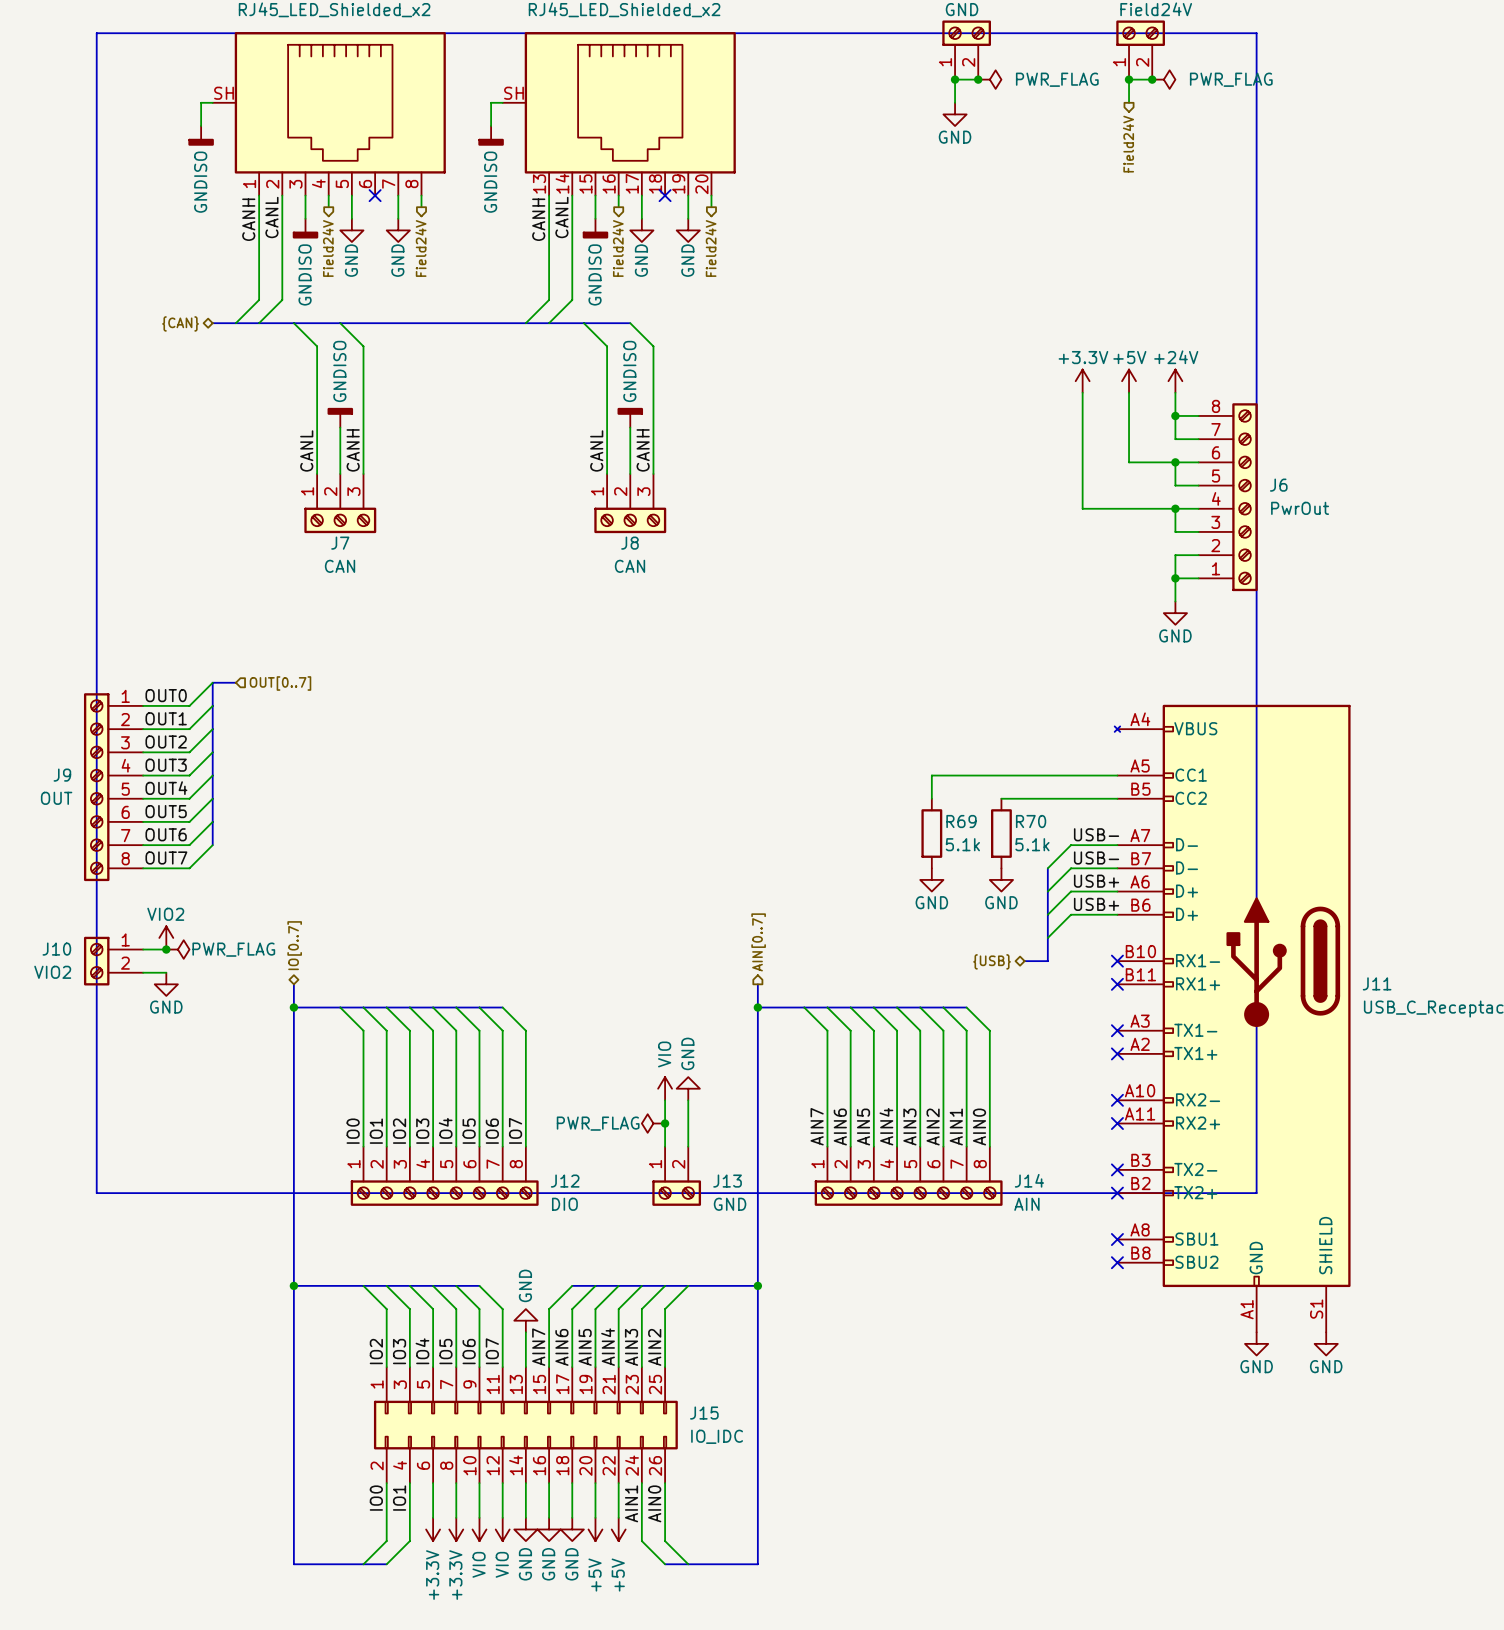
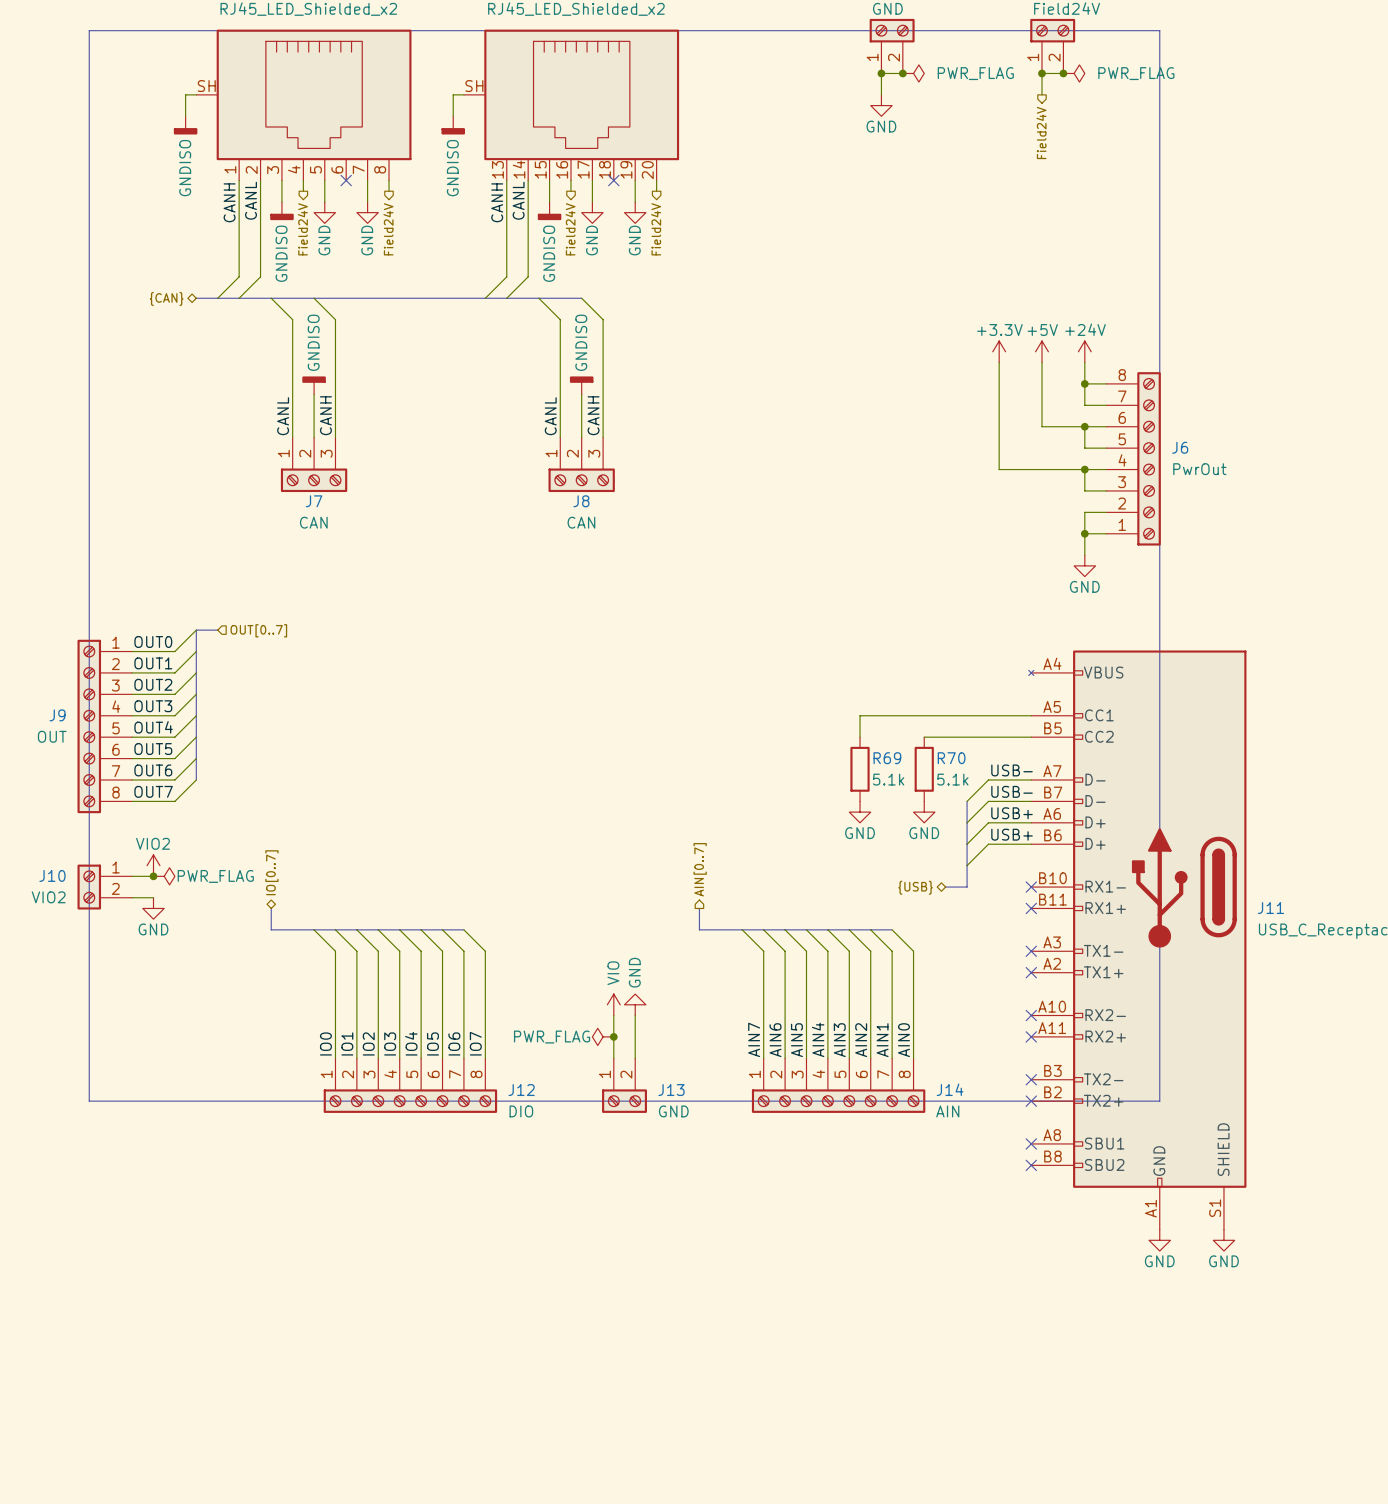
bus: (293, 1007) (293, 1564) (386, 1564) -> none
junction: (293, 1007) -> none
bus: (757, 1007) (757, 1564) (665, 1564) -> none
junction: (757, 1007) -> none
bus: (293, 1285) (479, 1285) -> none
junction: (293, 1285) -> none
wire: (363, 1285) (386, 1309) (386, 1367) -> none
wire: (386, 1285) (409, 1309) (409, 1367) -> none
wire: (409, 1285) (433, 1309) (433, 1367) -> none
wire: (433, 1285) (456, 1309) (456, 1367) -> none
wire: (456, 1285) (479, 1309) (479, 1367) -> none
wire: (479, 1285) (502, 1309) (502, 1367) -> none
wire: (572, 1285) (549, 1309) (549, 1367) -> none
bus: (572, 1285) (757, 1285) -> none
wire: (595, 1285) (572, 1309) (572, 1367) -> none
wire: (618, 1285) (595, 1309) (595, 1367) -> none
wire: (641, 1285) (618, 1309) (618, 1367) -> none
wire: (665, 1285) (641, 1309) (641, 1367) -> none
wire: (688, 1285) (665, 1309) (665, 1367) -> none
junction: (757, 1285) -> none
power symbol: GND (525, 1320) -> none
wire: (525, 1332) (525, 1367) -> none
label: AIN7 (538, 1347) -> none
label: AIN6 (561, 1347) -> none
label: AIN5 (585, 1347) -> none
label: AIN4 (608, 1347) -> none
label: AIN3 (631, 1347) -> none
label: AIN2 (654, 1347) -> none
label: IO2 (376, 1351) -> none
label: IO3 (399, 1351) -> none
label: IO4 (422, 1351) -> none
label: IO5 (445, 1351) -> none
label: IO6 (469, 1351) -> none
label: IO7 (492, 1351) -> none
J15: IO_IDC (525, 1425) -> none
wire: (386, 1483) (386, 1541) (363, 1564) -> none
wire: (409, 1483) (409, 1541) (386, 1564) -> none
wire: (433, 1483) (433, 1517) -> none
wire: (456, 1483) (456, 1517) -> none
wire: (479, 1483) (479, 1517) -> none
wire: (502, 1483) (502, 1517) -> none
wire: (525, 1483) (525, 1517) -> none
wire: (549, 1483) (549, 1517) -> none
wire: (572, 1483) (572, 1517) -> none
wire: (595, 1483) (595, 1517) -> none
wire: (618, 1483) (618, 1517) -> none
wire: (641, 1483) (641, 1541) (665, 1564) -> none
wire: (665, 1483) (665, 1541) (688, 1564) -> none
label: IO0 (376, 1498) -> none
label: IO1 (399, 1498) -> none
label: AIN1 (631, 1503) -> none
label: AIN0 (654, 1503) -> none
power symbol: +3.3V (433, 1529) -> none
power symbol: +3.3V (456, 1529) -> none
power symbol: VIO (479, 1529) -> none
power symbol: VIO (502, 1529) -> none
power symbol: GND (525, 1529) -> none
power symbol: GND (549, 1529) -> none
power symbol: GND (572, 1529) -> none
power symbol: +5V (595, 1529) -> none
power symbol: +5V (618, 1529) -> none

